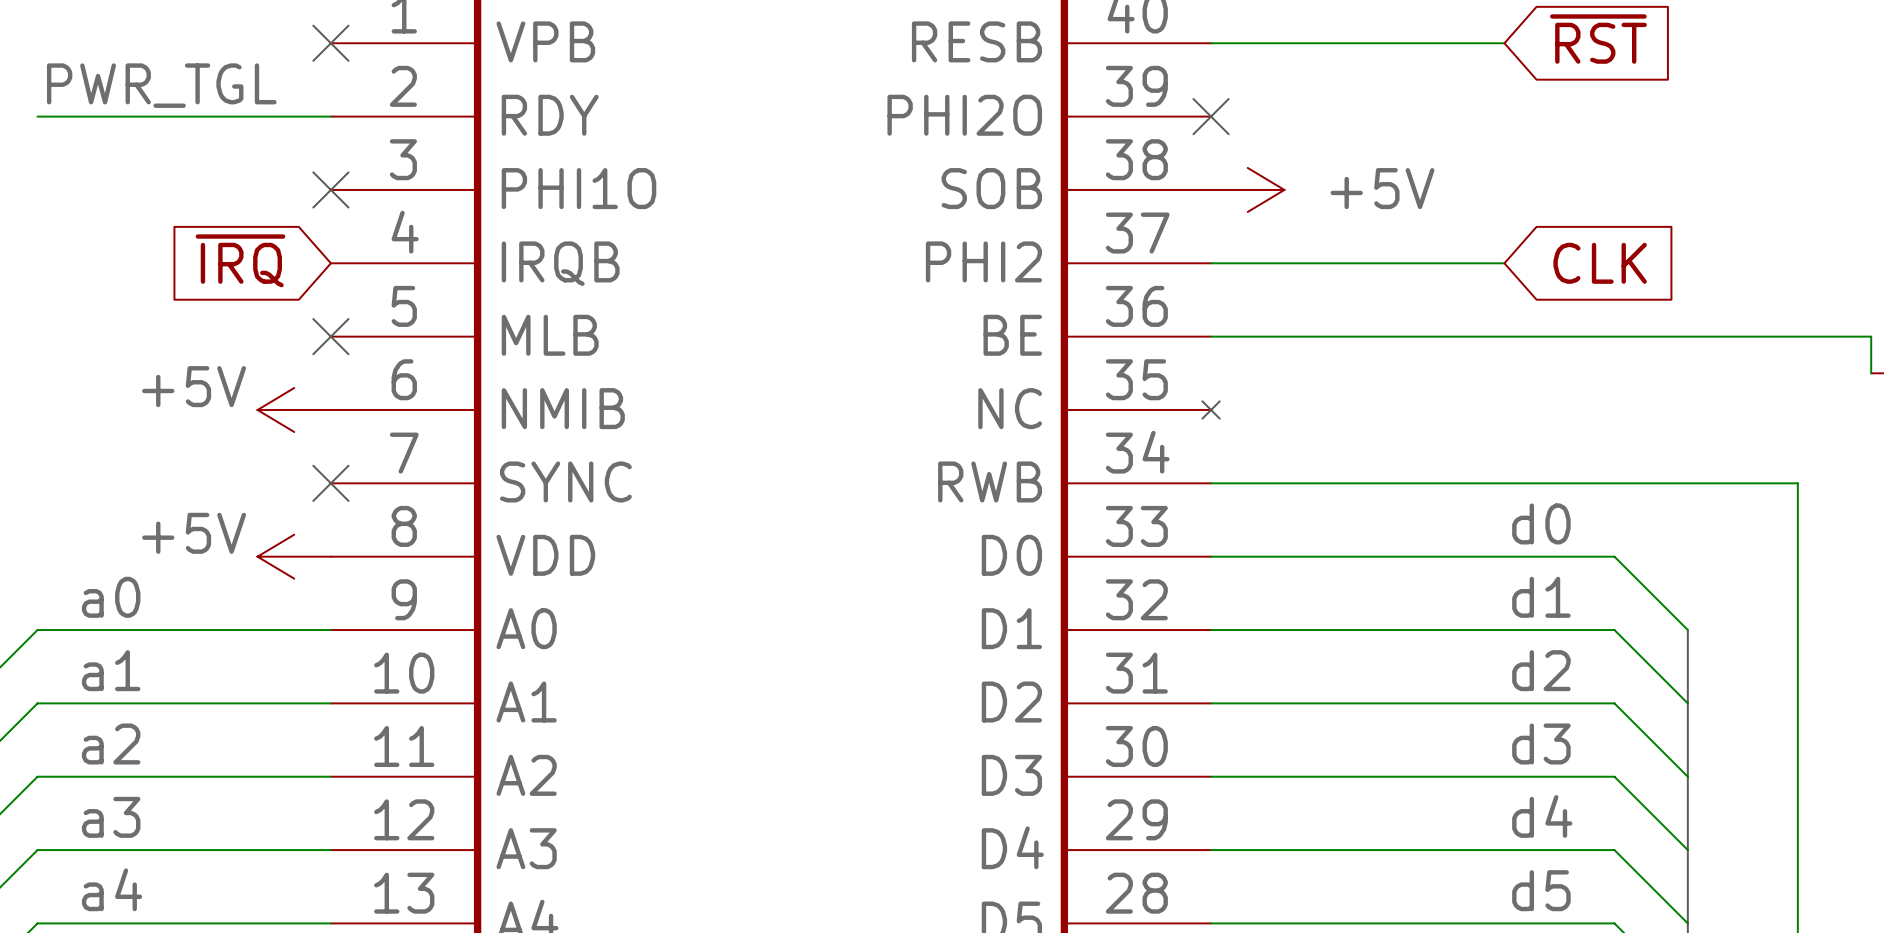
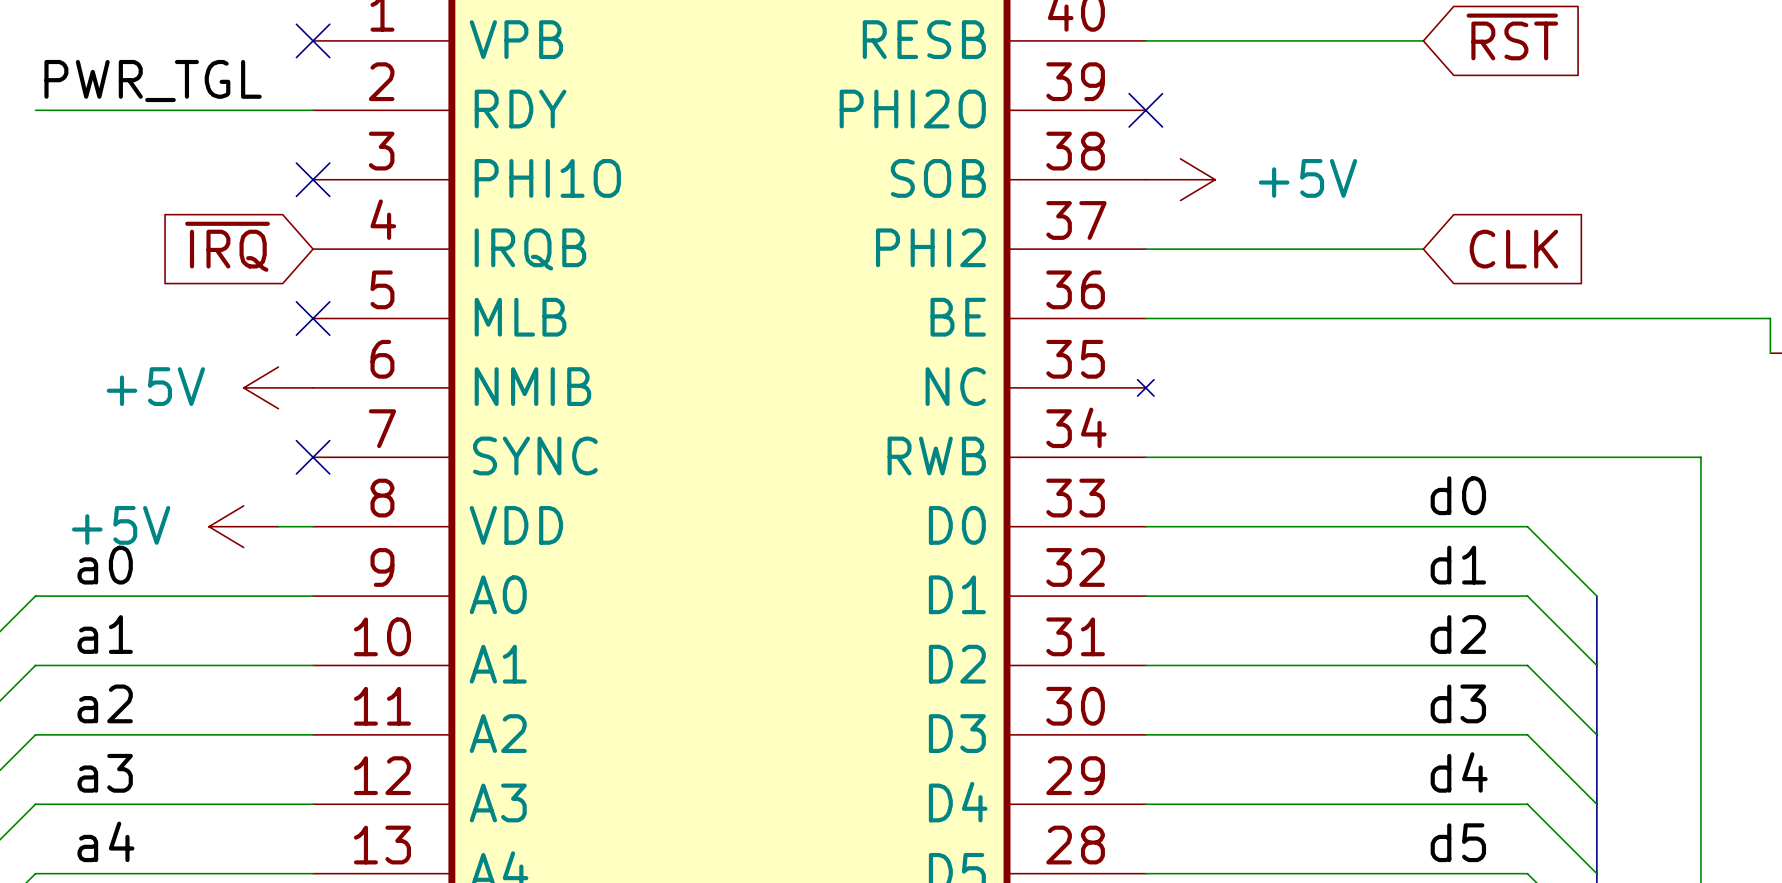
power symbol text position: +5V (194, 386) -> +5V (155, 386)
power symbol text position: +5V (194, 533) -> +5V (121, 525)
power symbol position: +5V (294, 556) -> +5V (243, 526)

